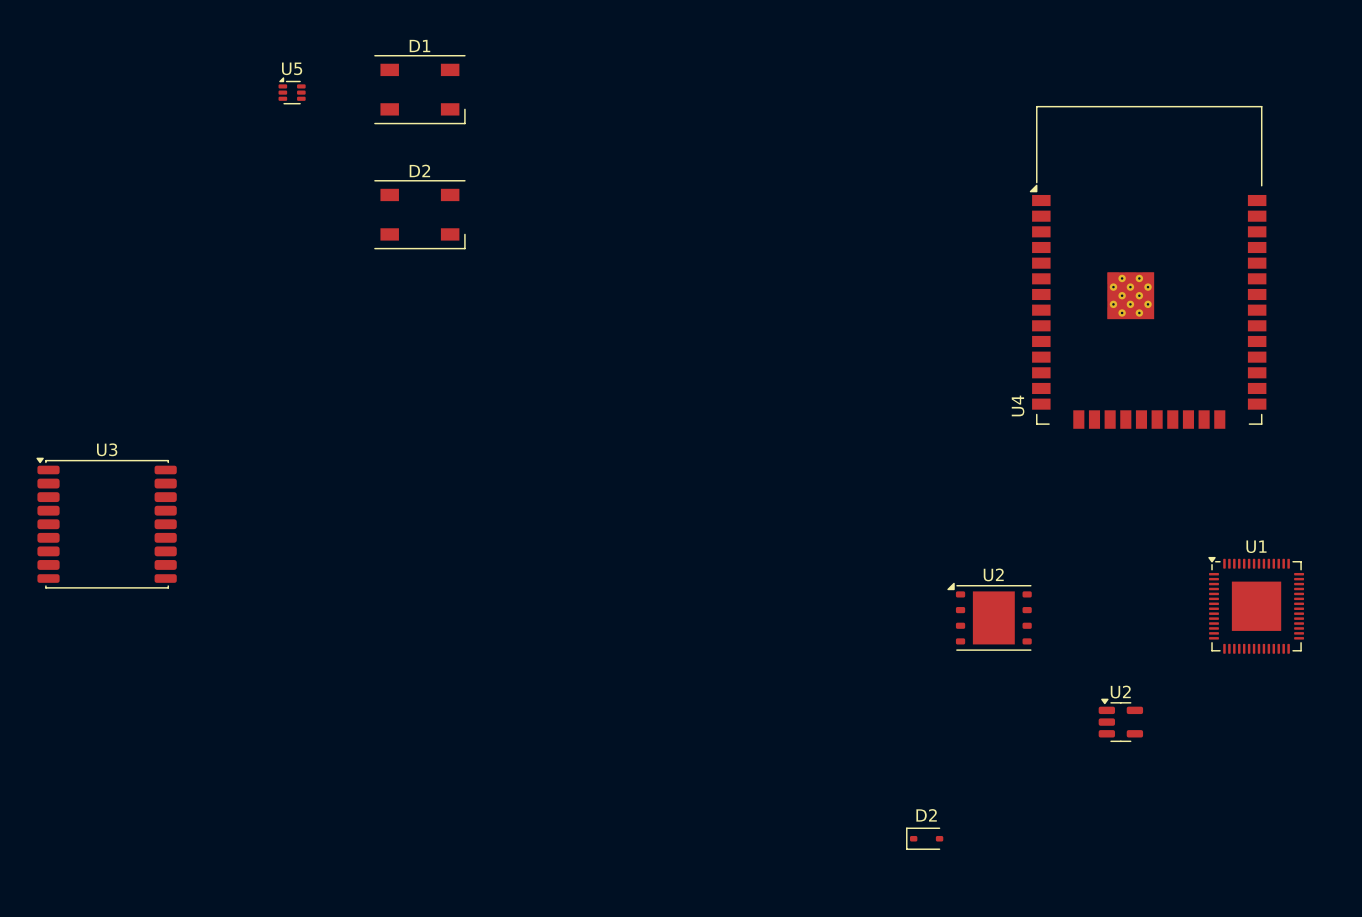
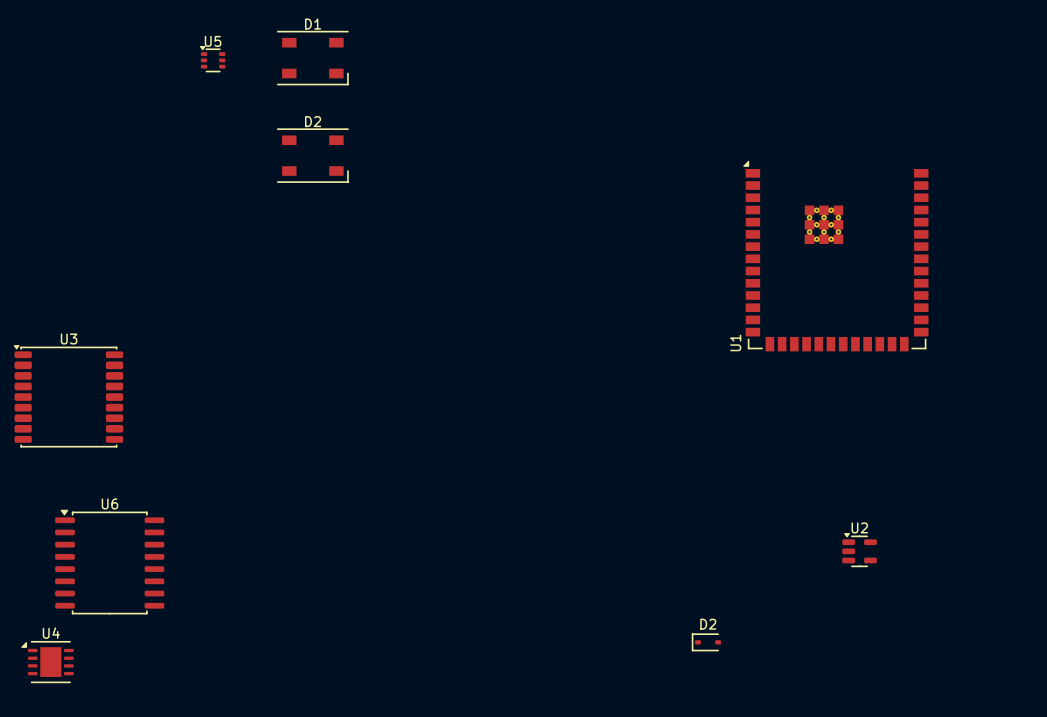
U5 footprint: [278, 77, 306, 105] -> [199, 45, 226, 73]
U4 footprint: [1029, 105, 1267, 429] -> [21, 641, 74, 683]
U4 name position: U4 (1018, 405) -> U4 (51, 633)
U1 name position: U1 (1256, 546) -> U1 (735, 342)
U1 footprint: [1208, 556, 1305, 654] -> [743, 160, 929, 352]
U2: (989, 616) -> none
U6: none -> (109, 561)

